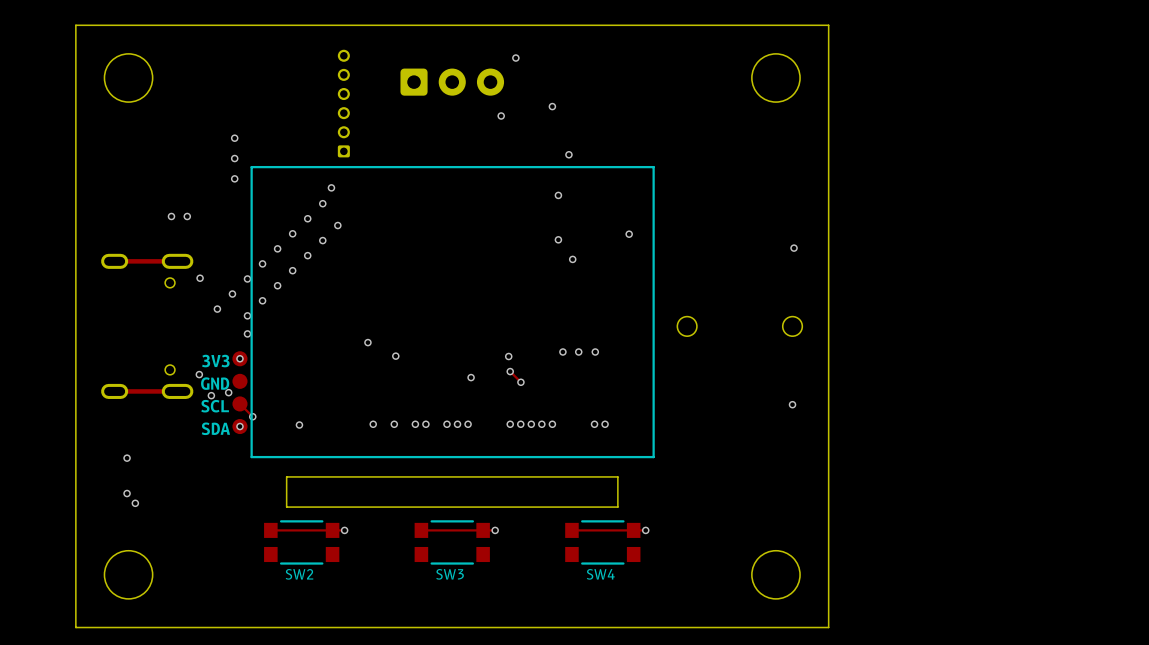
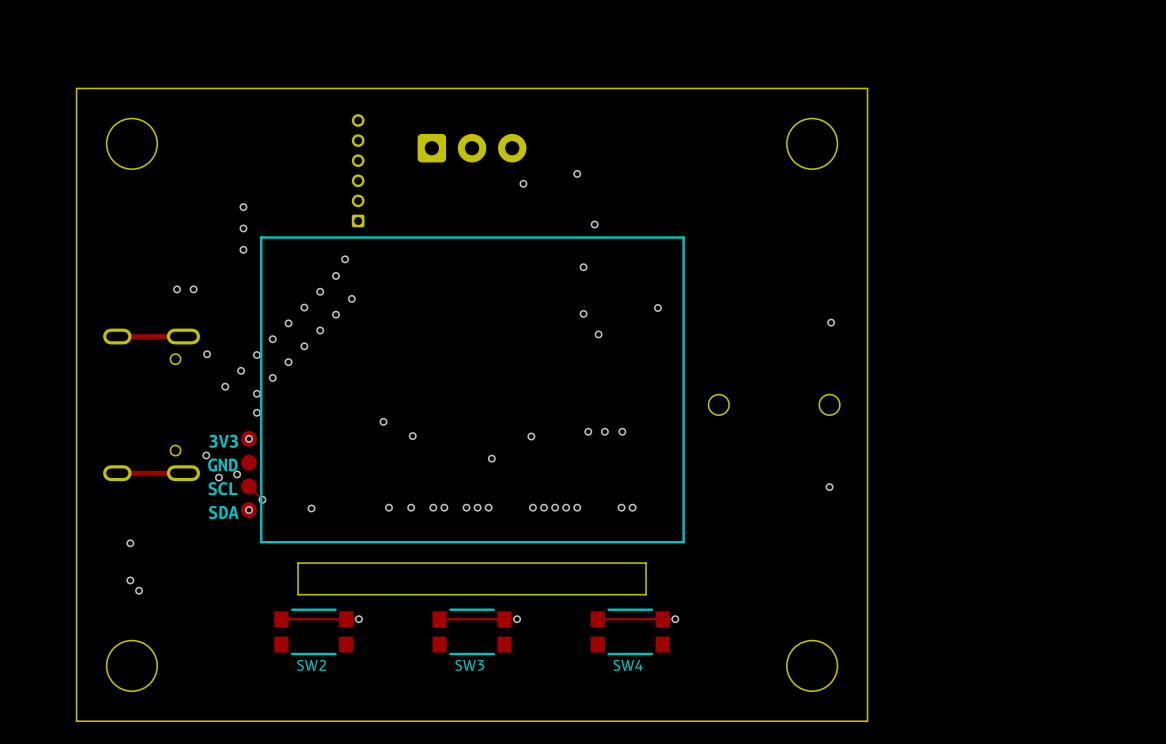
via: (515, 58) -> none
track: (510, 371) (520, 382) -> none
via: (510, 371) -> none
via: (520, 382) -> none

